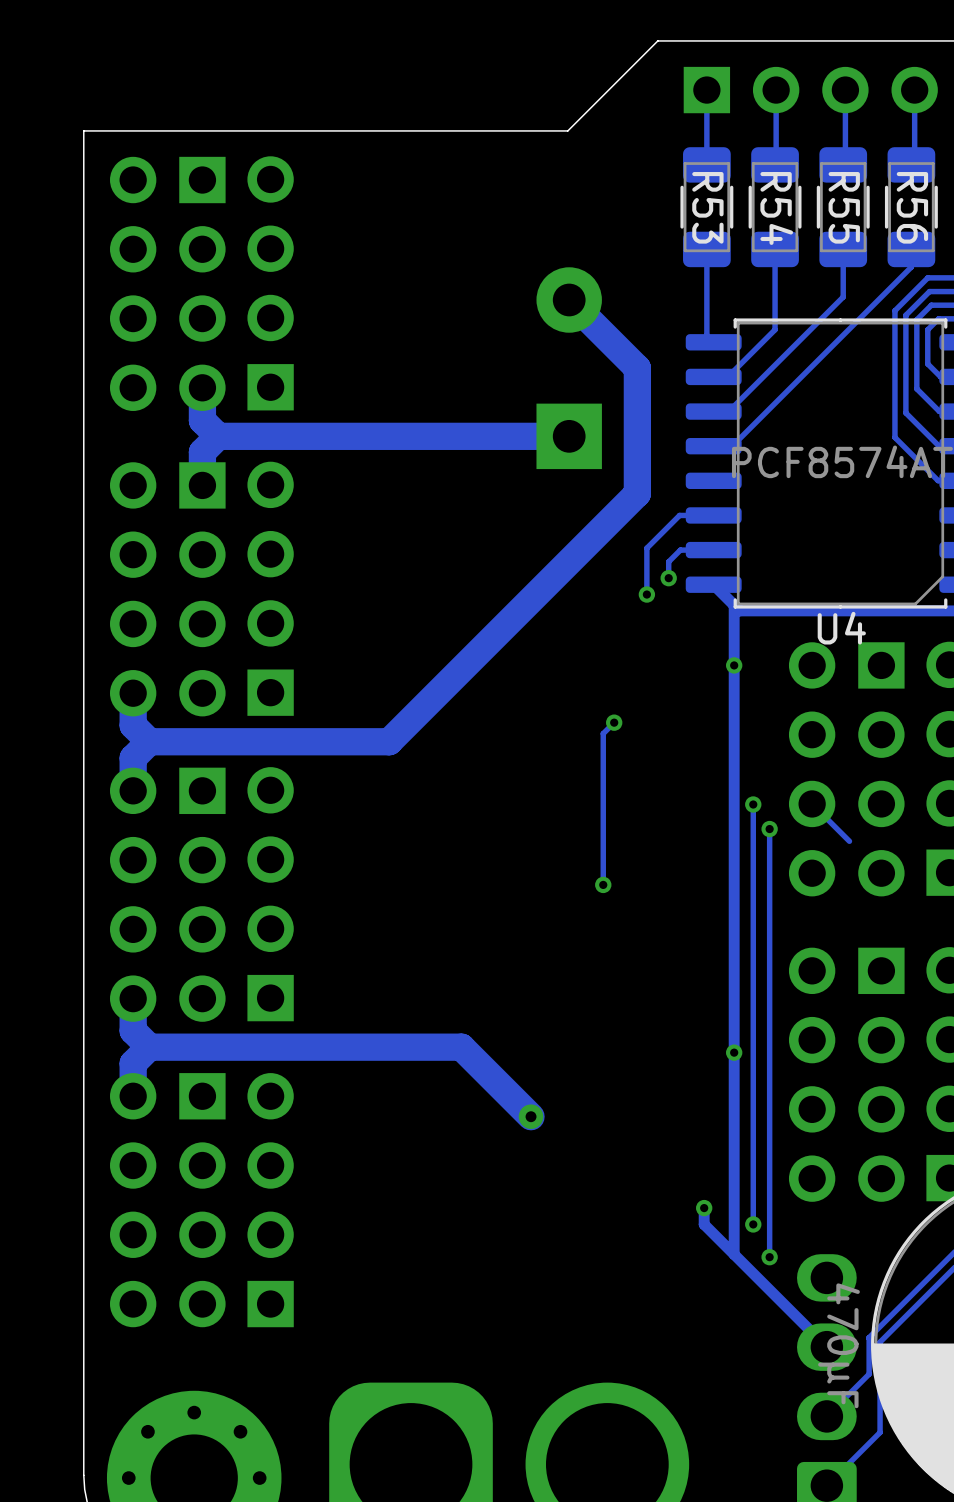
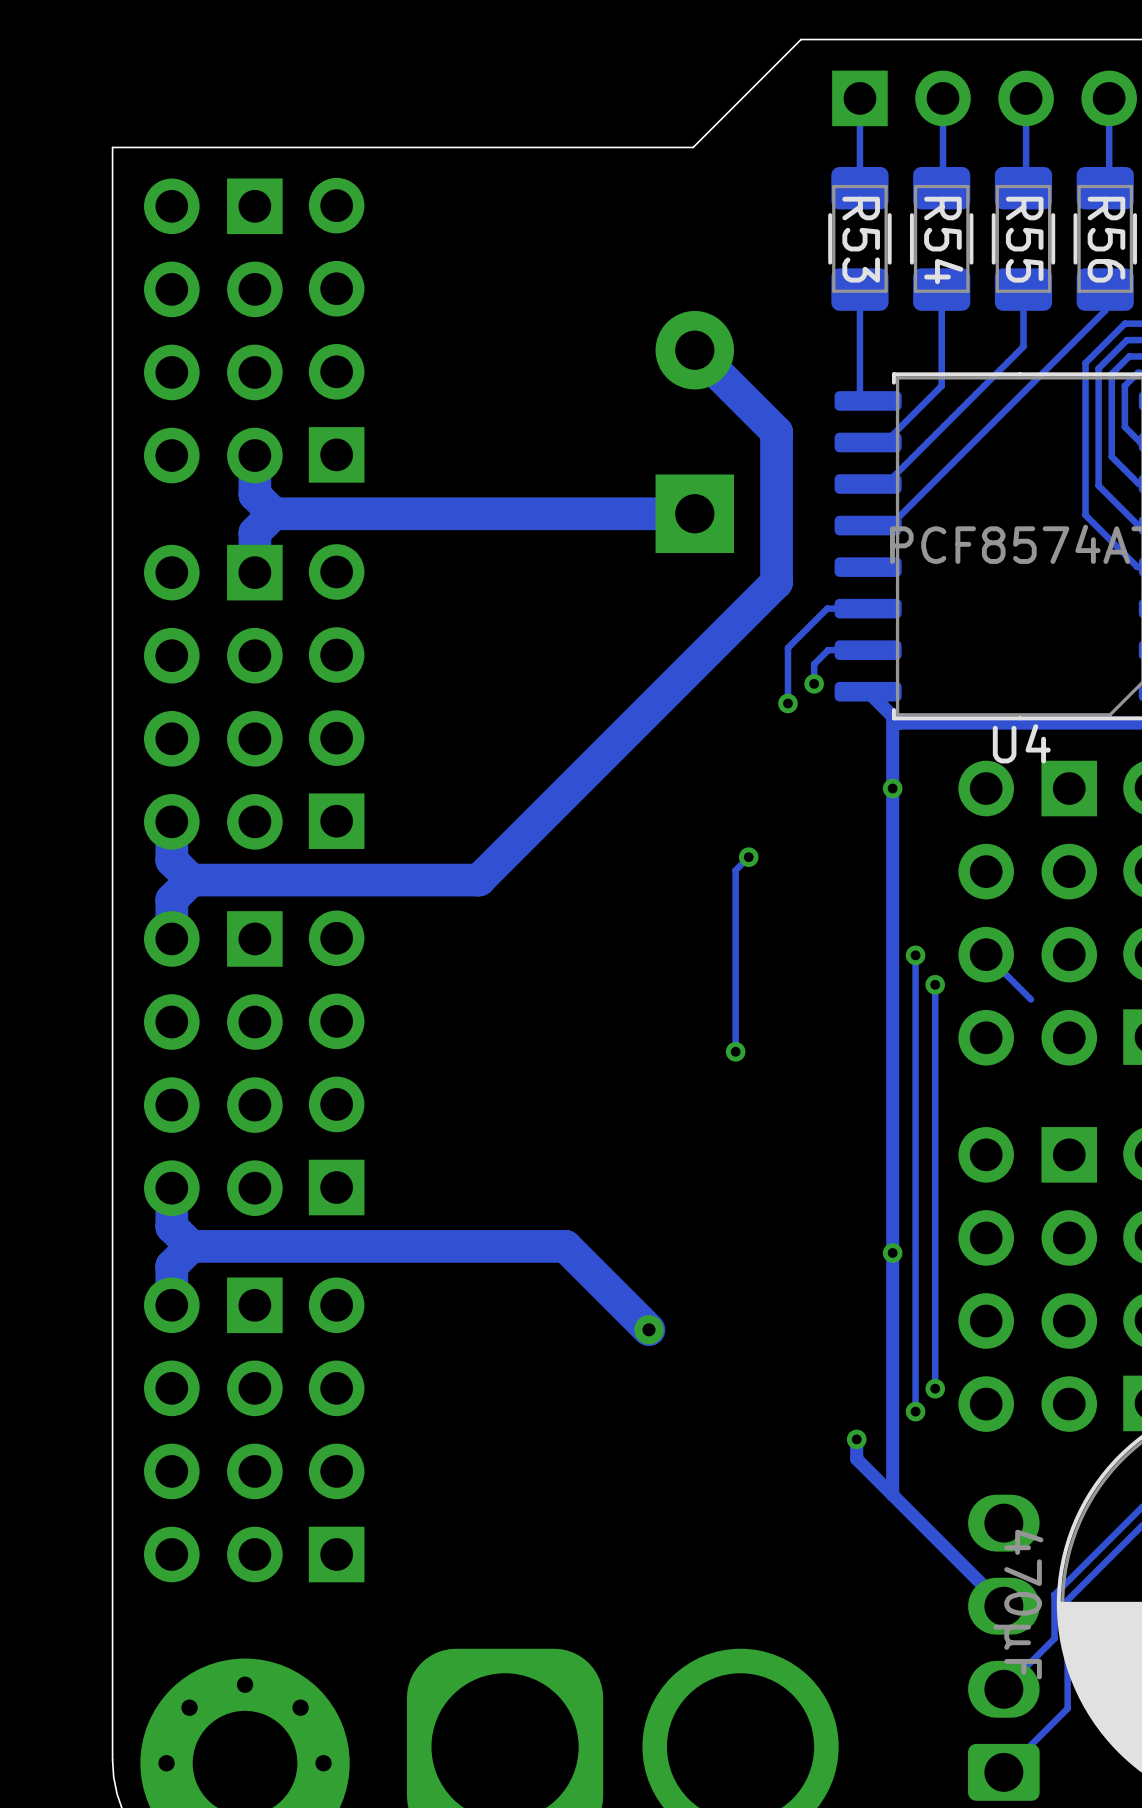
track: (769, 1165) (769, 1257) -> none
via: none -> (935, 1388)
track: (753, 1184) (753, 1224) -> none
via: none -> (915, 1411)
via: (753, 1224) -> none
via: (769, 1257) -> none

